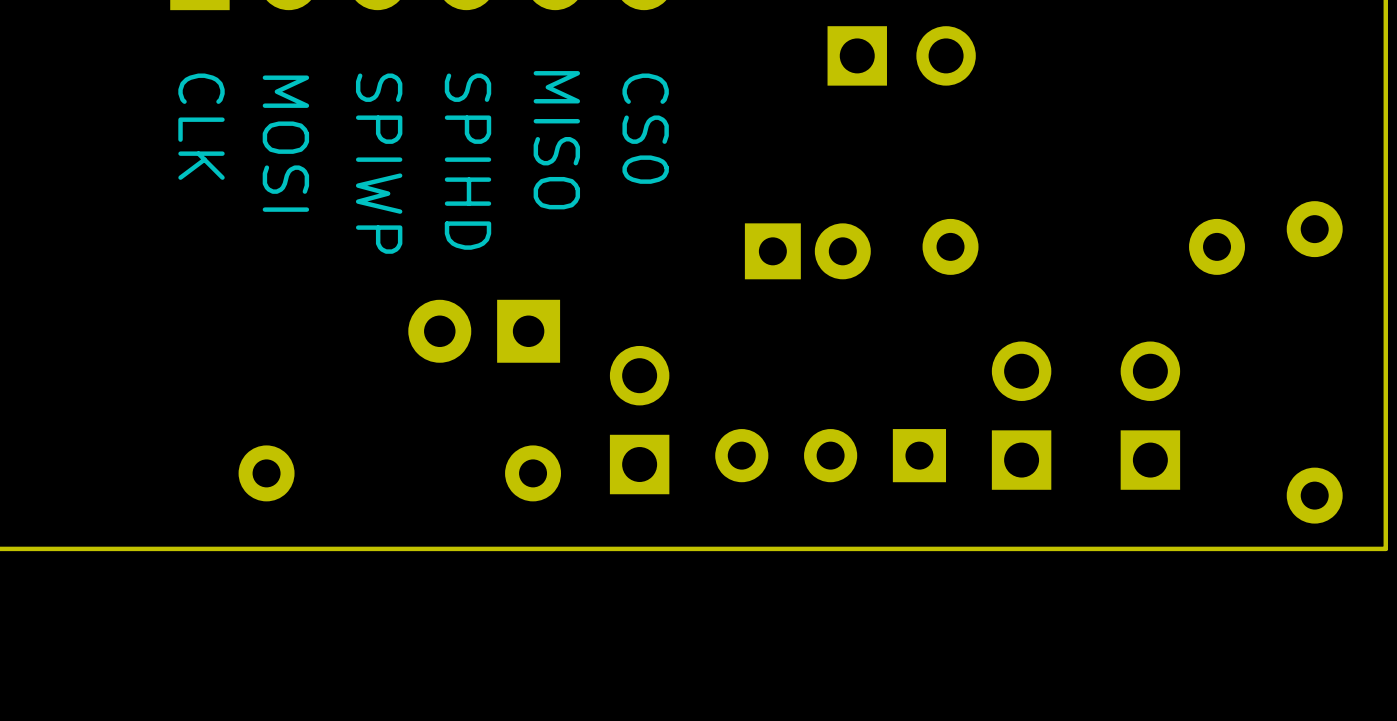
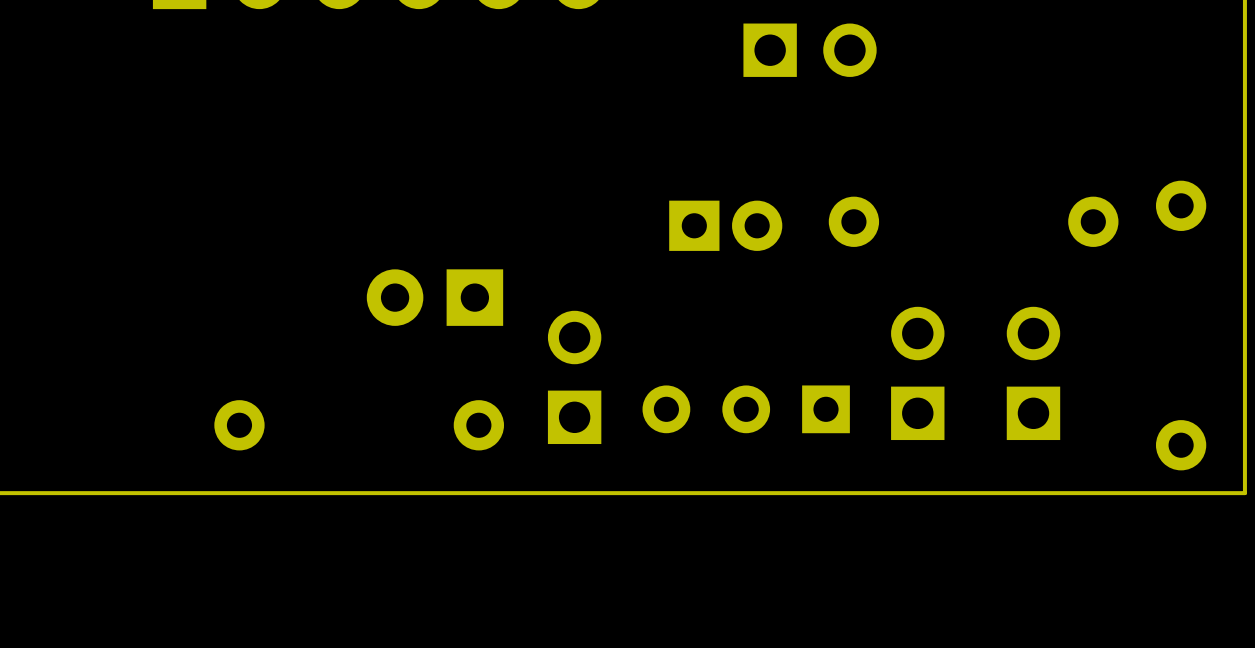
text: CLK (201, 126) -> none
text: CS0 (645, 128) -> none
text: MISO (556, 140) -> none
text: MOSI (285, 143) -> none
text: SPIHD (467, 161) -> none
text: SPIWP (379, 163) -> none

